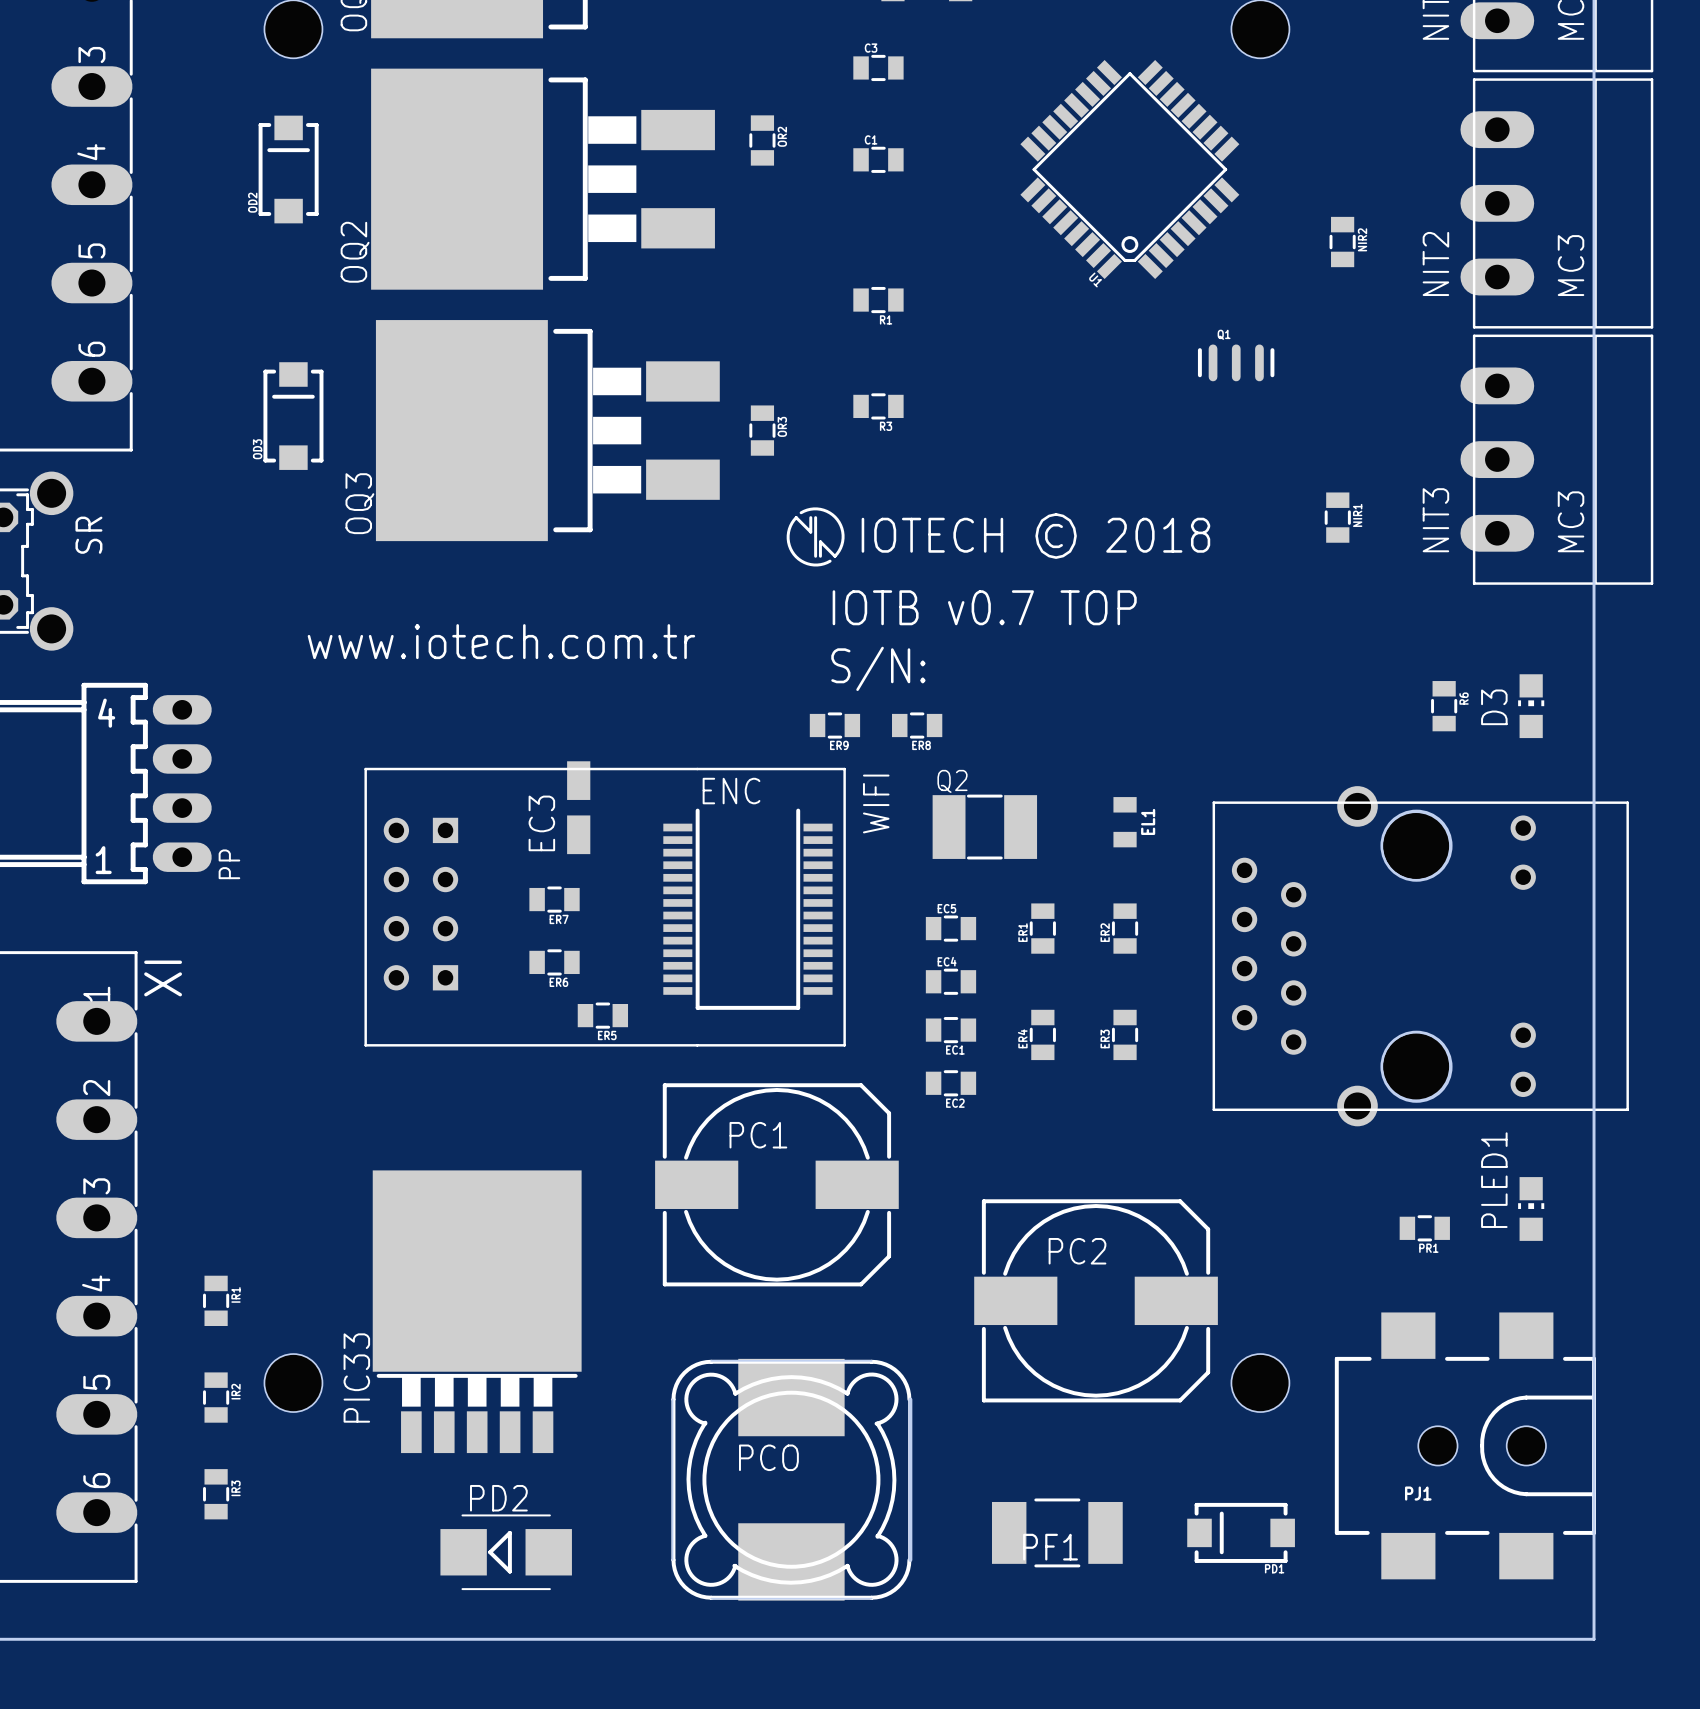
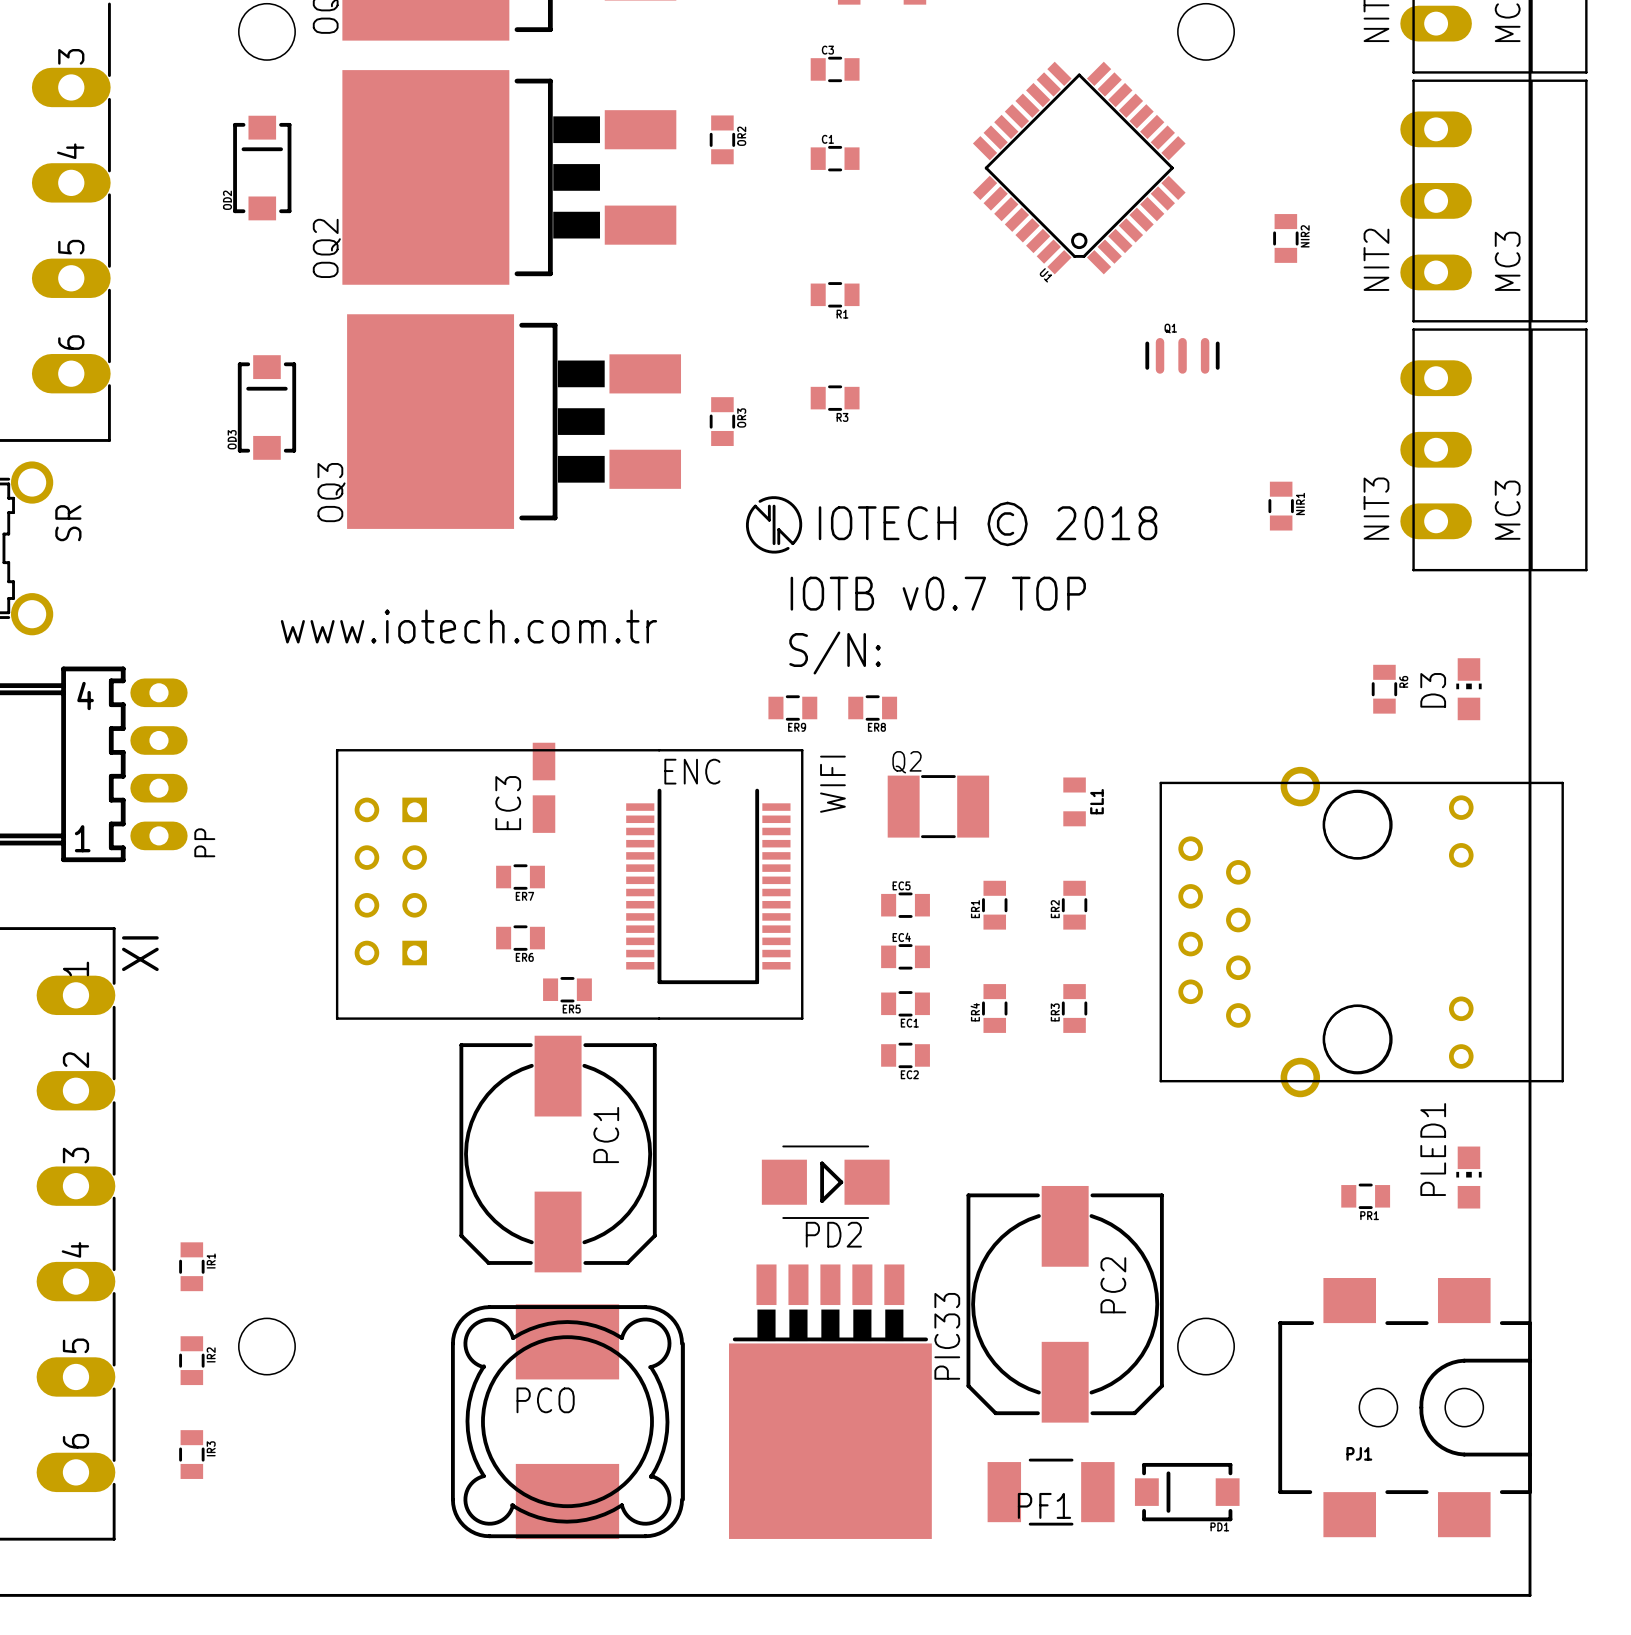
PC1 rotation: 0° (776, 1184) -> 90° clockwise (558, 1154)
PC1 position: (776, 1184) -> (558, 1154)
PC2 rotation: 0° (1096, 1300) -> 90° clockwise (1065, 1304)
PIC33 rotation: 0° (477, 1311) -> 180° (830, 1401)
PIC33 position: (477, 1311) -> (830, 1401)
PCO position: (791, 1479) -> (567, 1421)
PF1 position: (1057, 1532) -> (1051, 1492)
PD2 rotation: 0° (506, 1552) -> 180° (825, 1182)
PD2 position: (506, 1552) -> (825, 1182)

